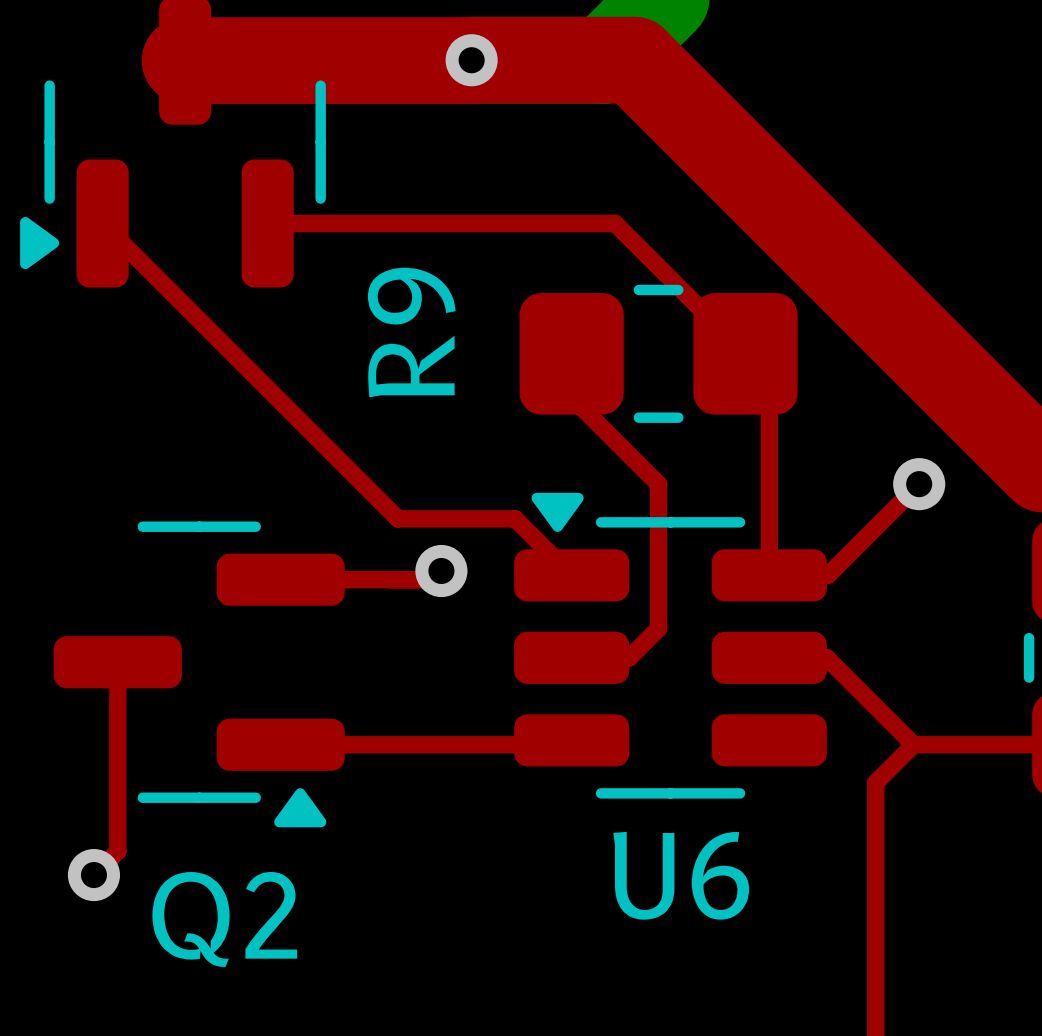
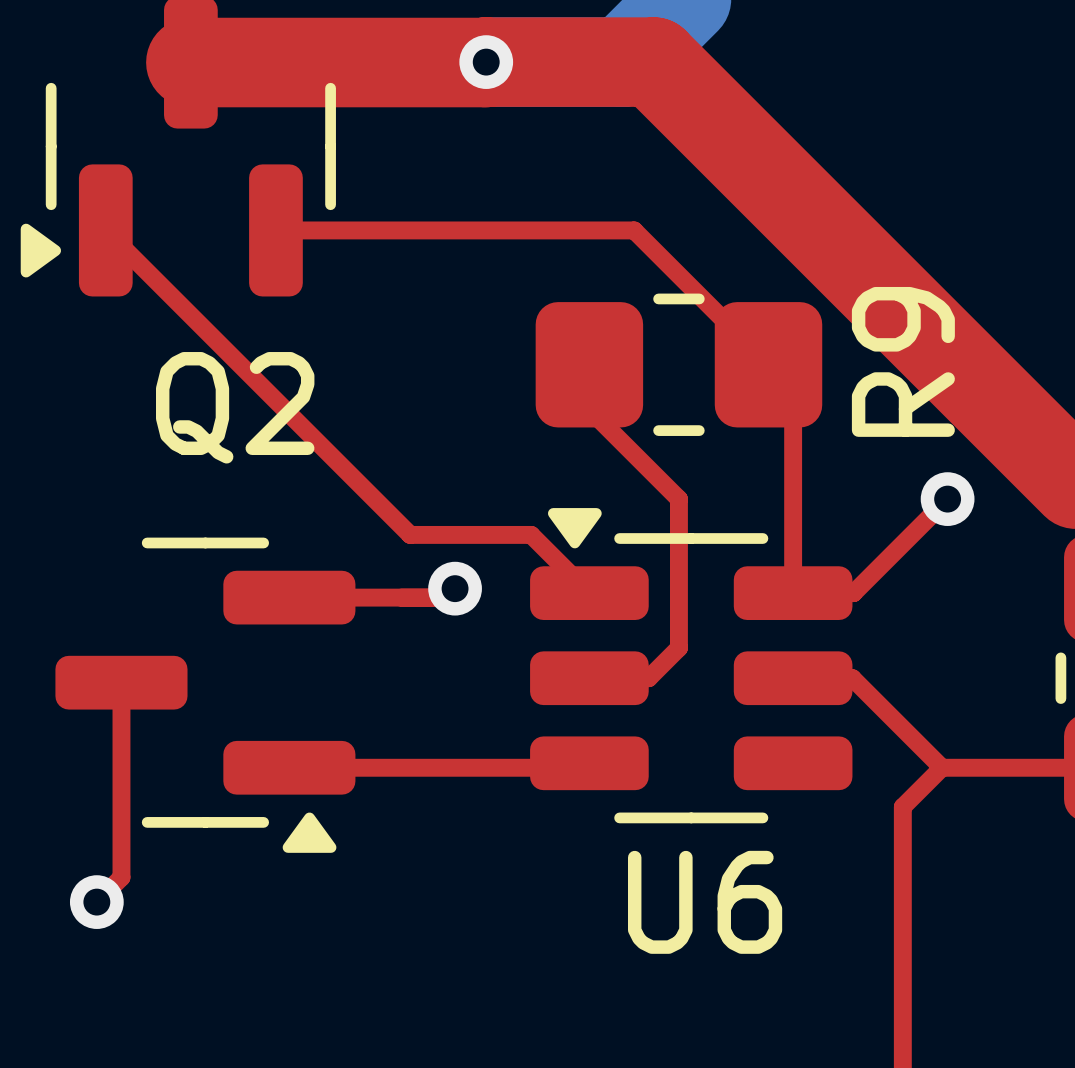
R9 name position: R9 (411, 332) -> R9 (903, 361)
Q2 name position: Q2 (224, 919) -> Q2 (235, 407)

